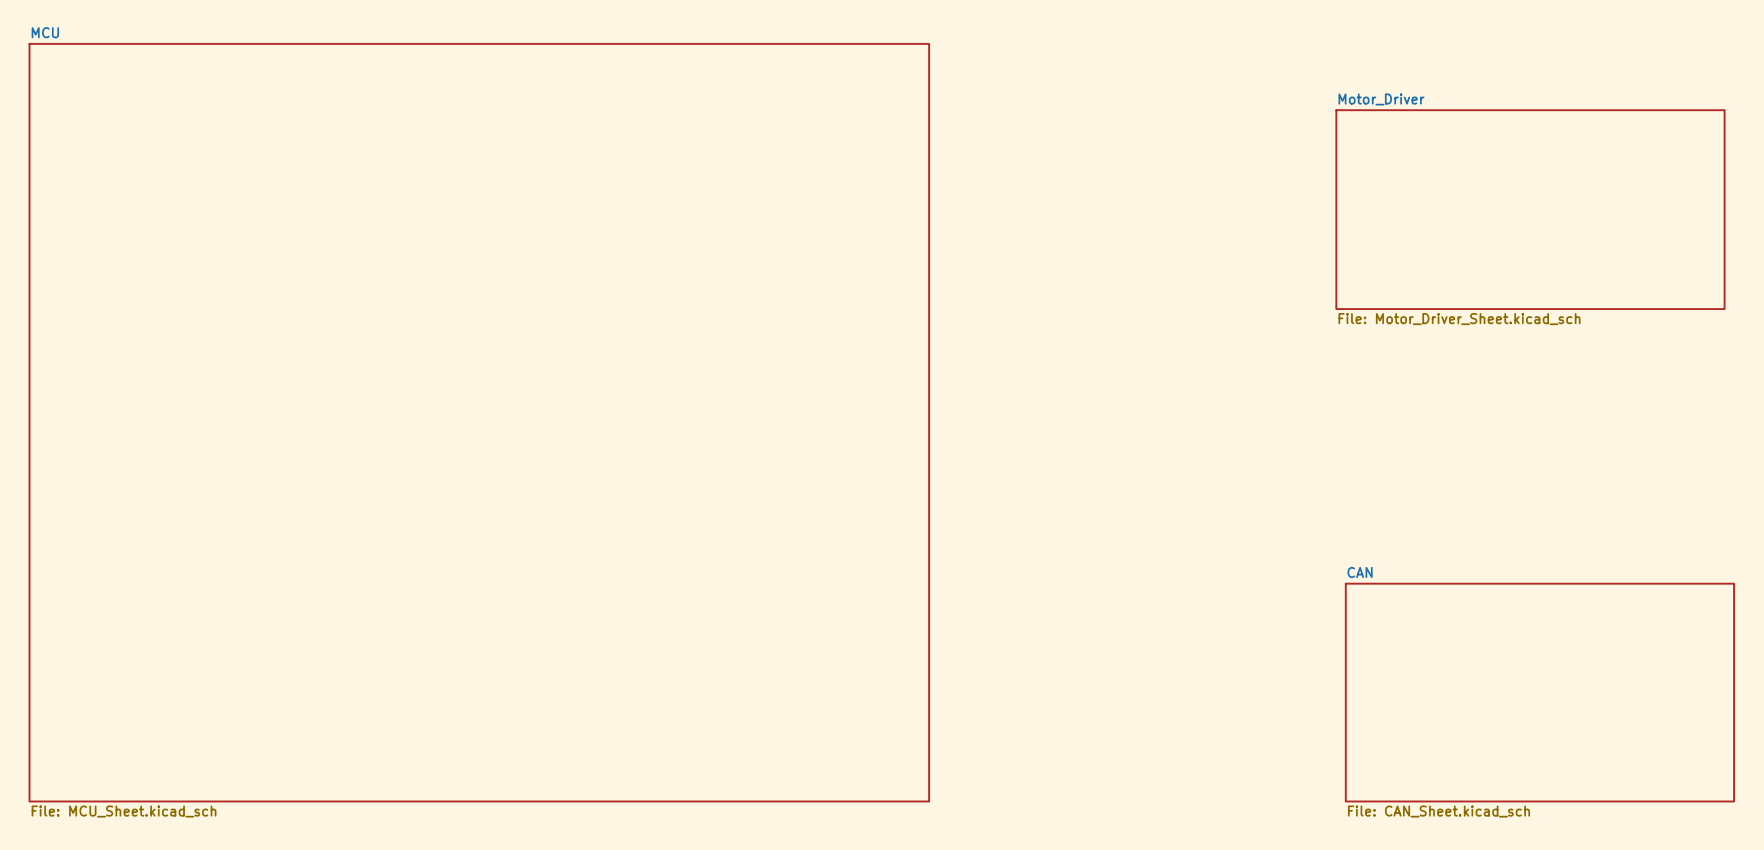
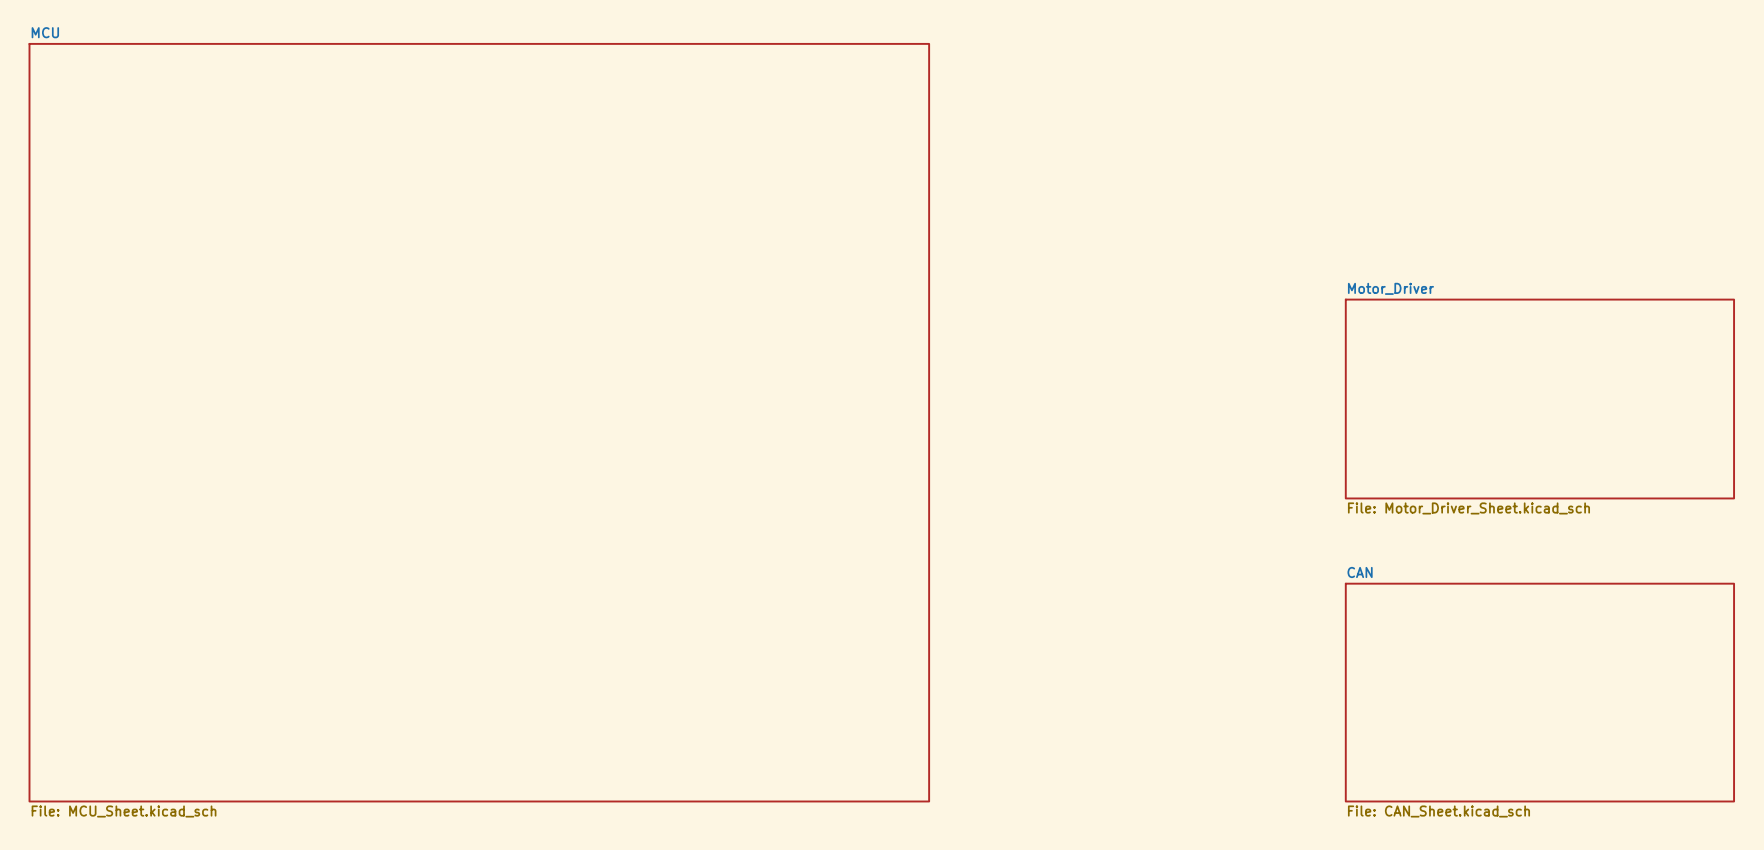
sheet Motor_Driver: File: Motor_Driver_Sheet.kicad_sch (1530, 209) -> none
sheet Motor_Driver: none -> File: Motor_Driver_Sheet.kicad_sch (1539, 399)

